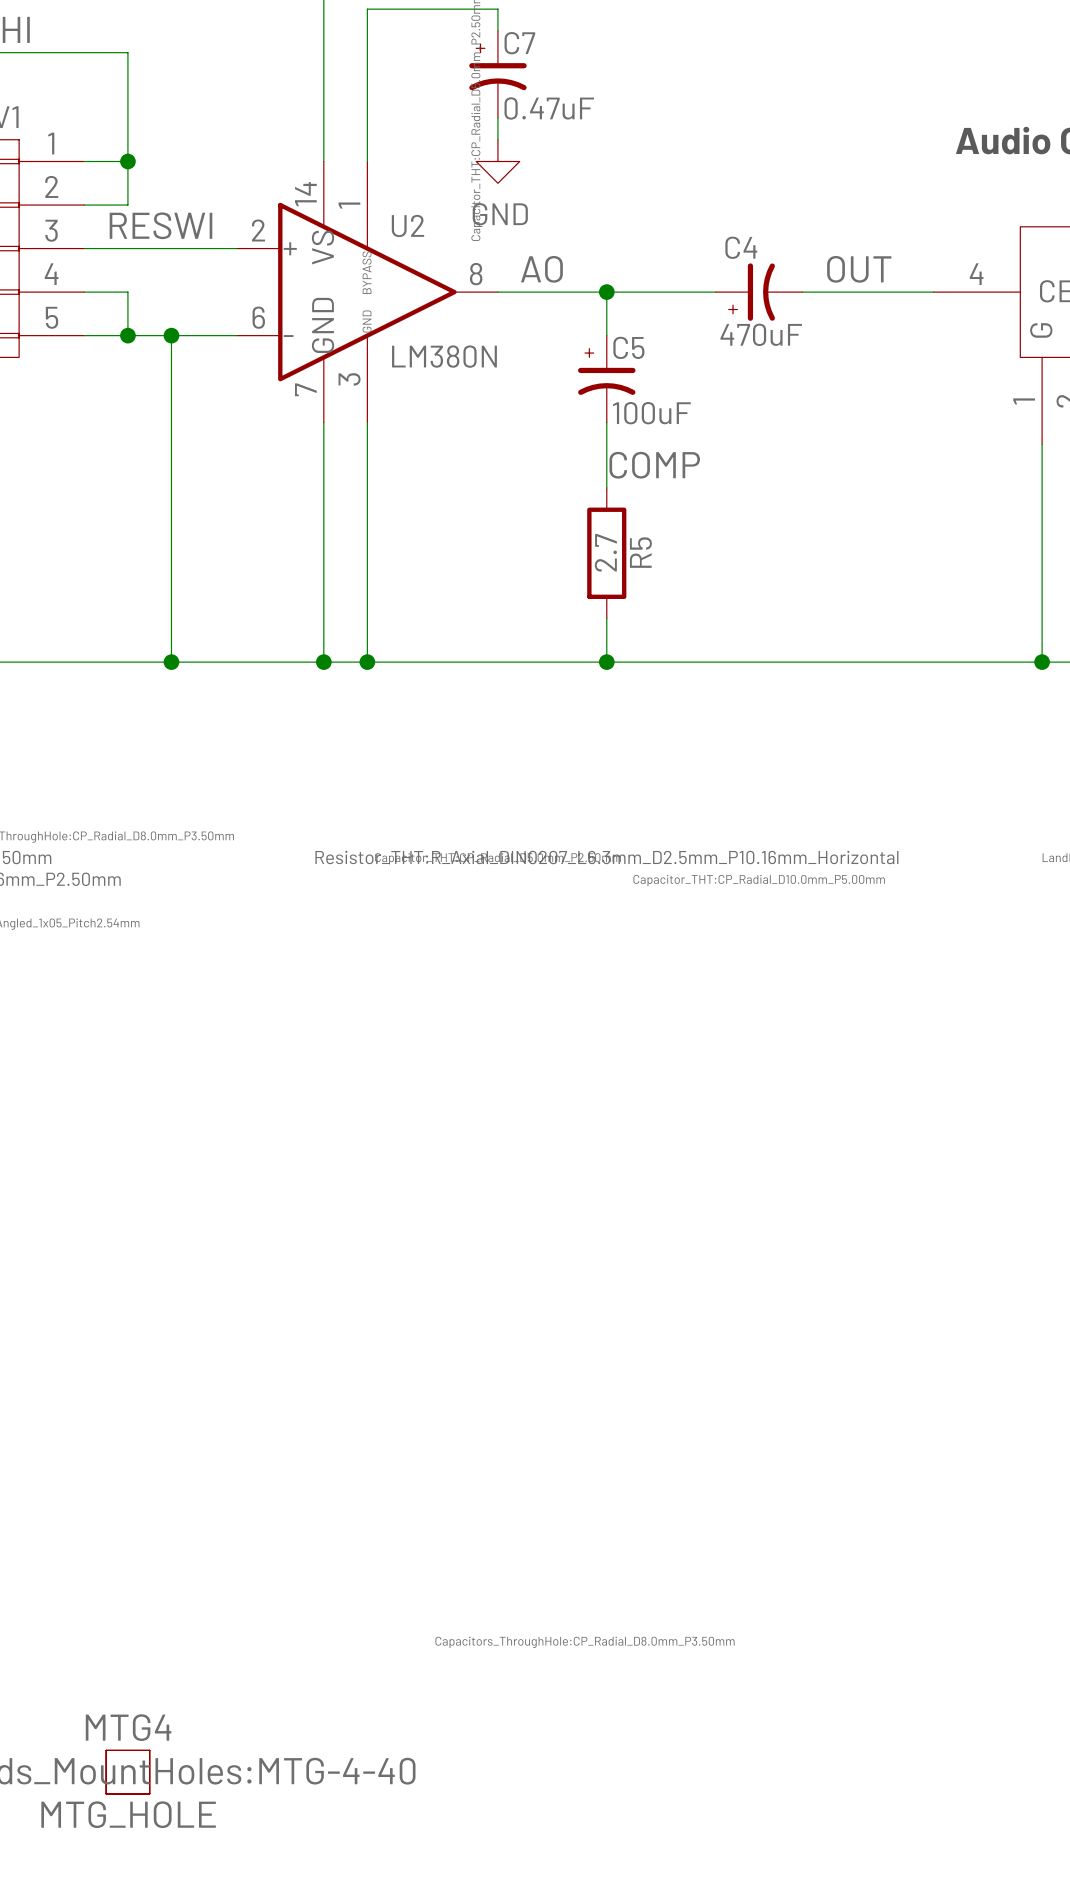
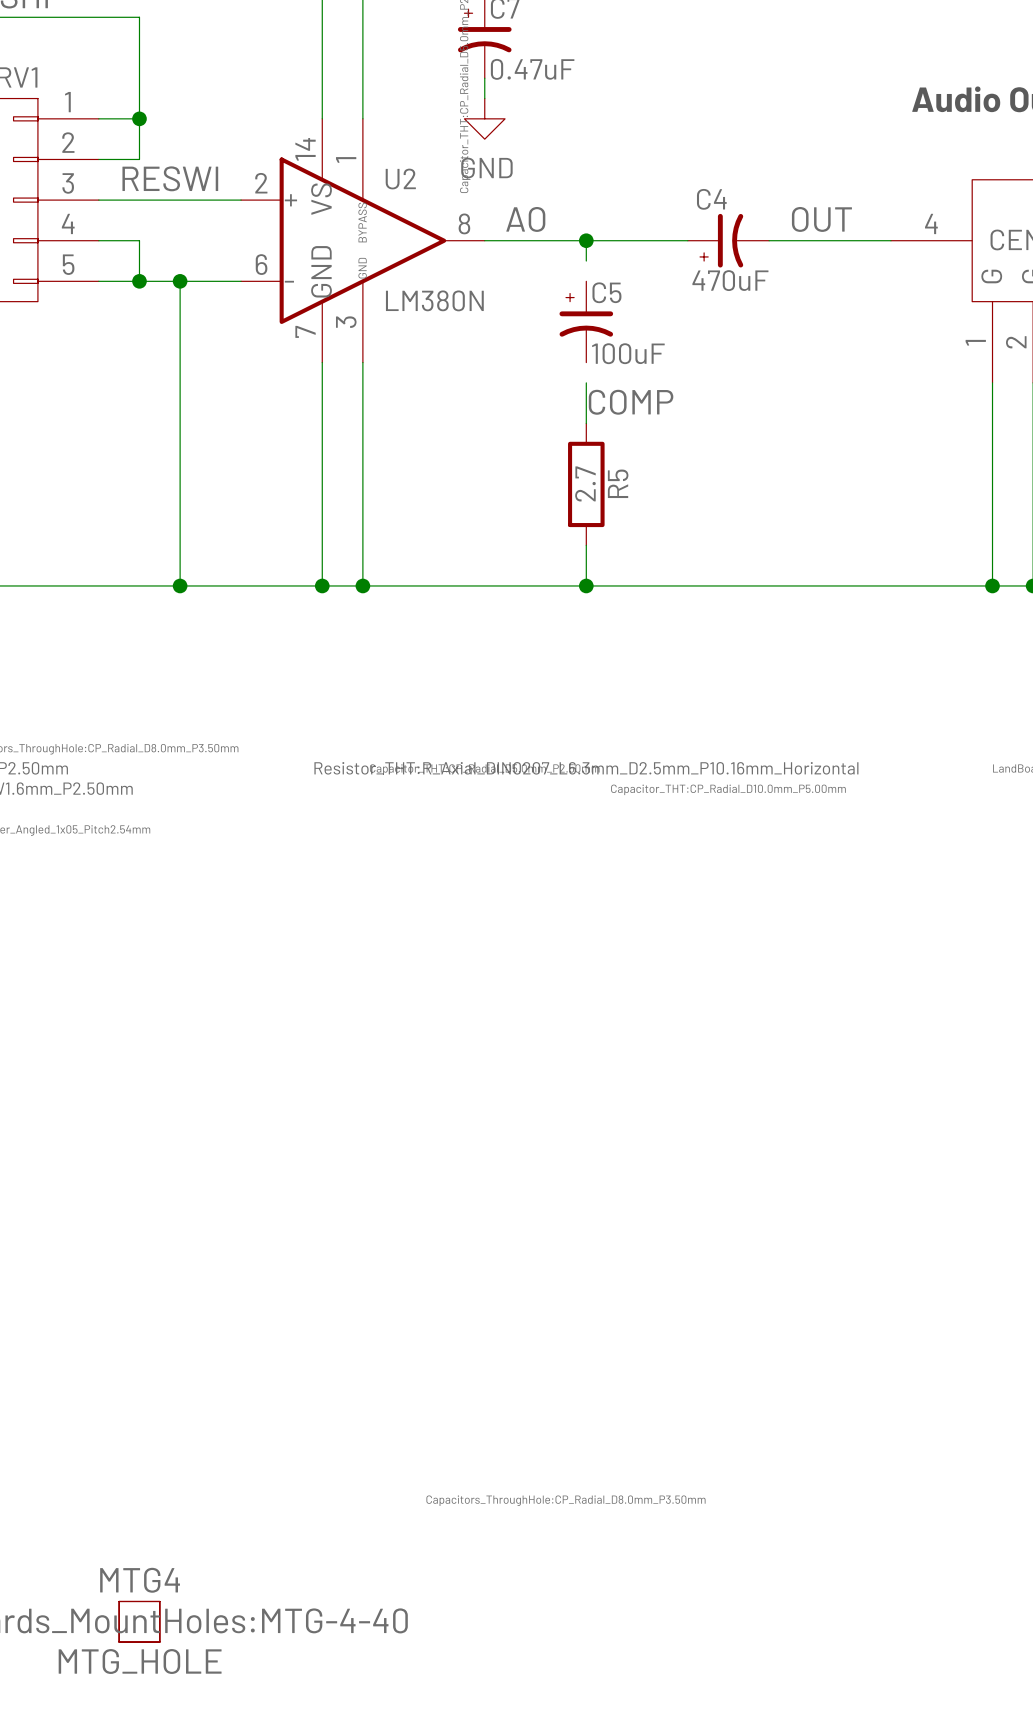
wire: (606, 313) (606, 335) -> none
wire: (606, 422) (606, 444) -> none

